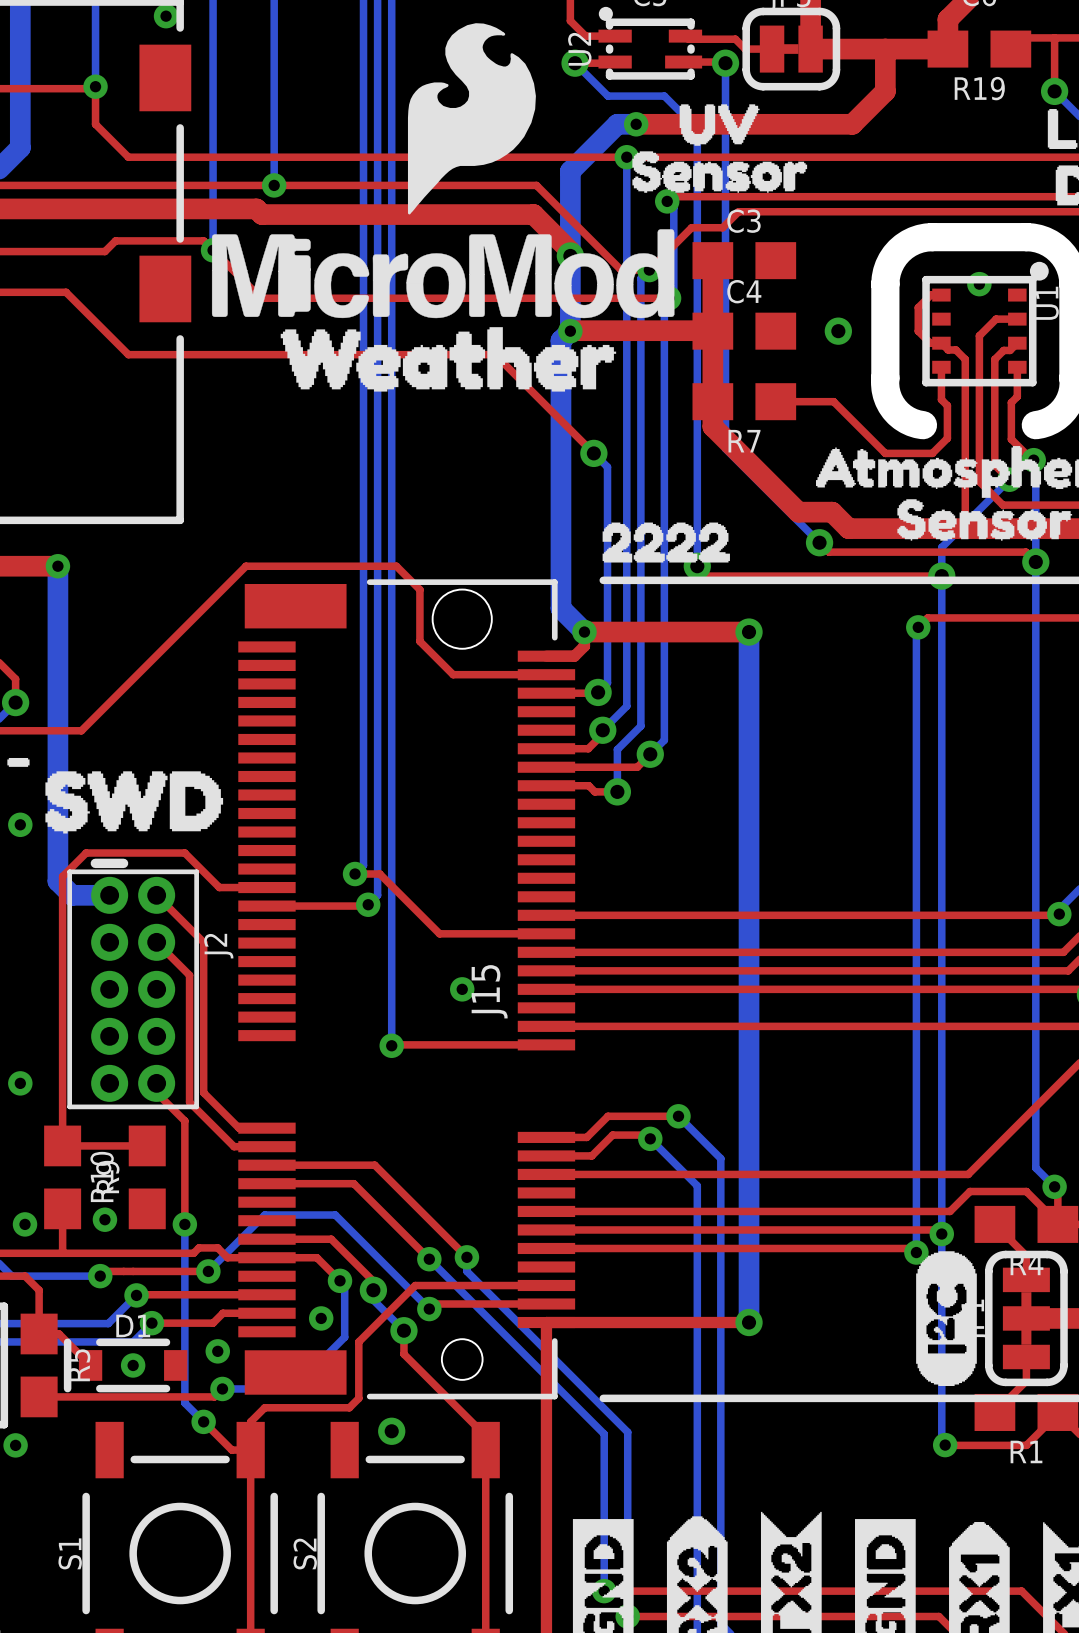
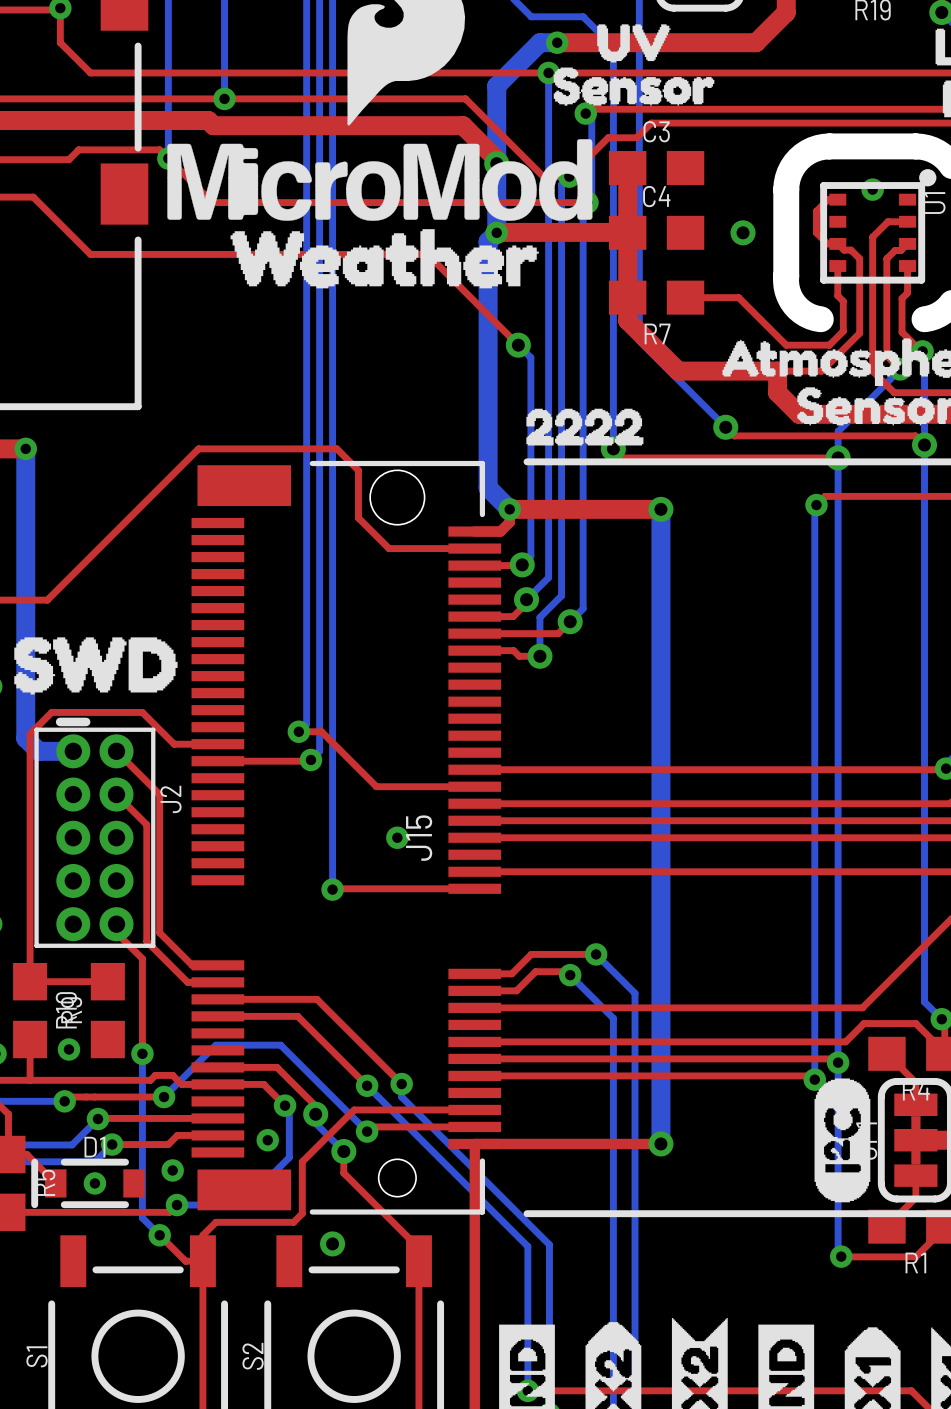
top track: (965, 440) (965, 528) -> (859, 333) (821, 371) (777, 371)
top track: (767, 481) (798, 512) (832, 512) (848, 528) (899, 528) -> (678, 371) (777, 371)
top track: none -> (777, 371) (777, 392) (799, 414)

